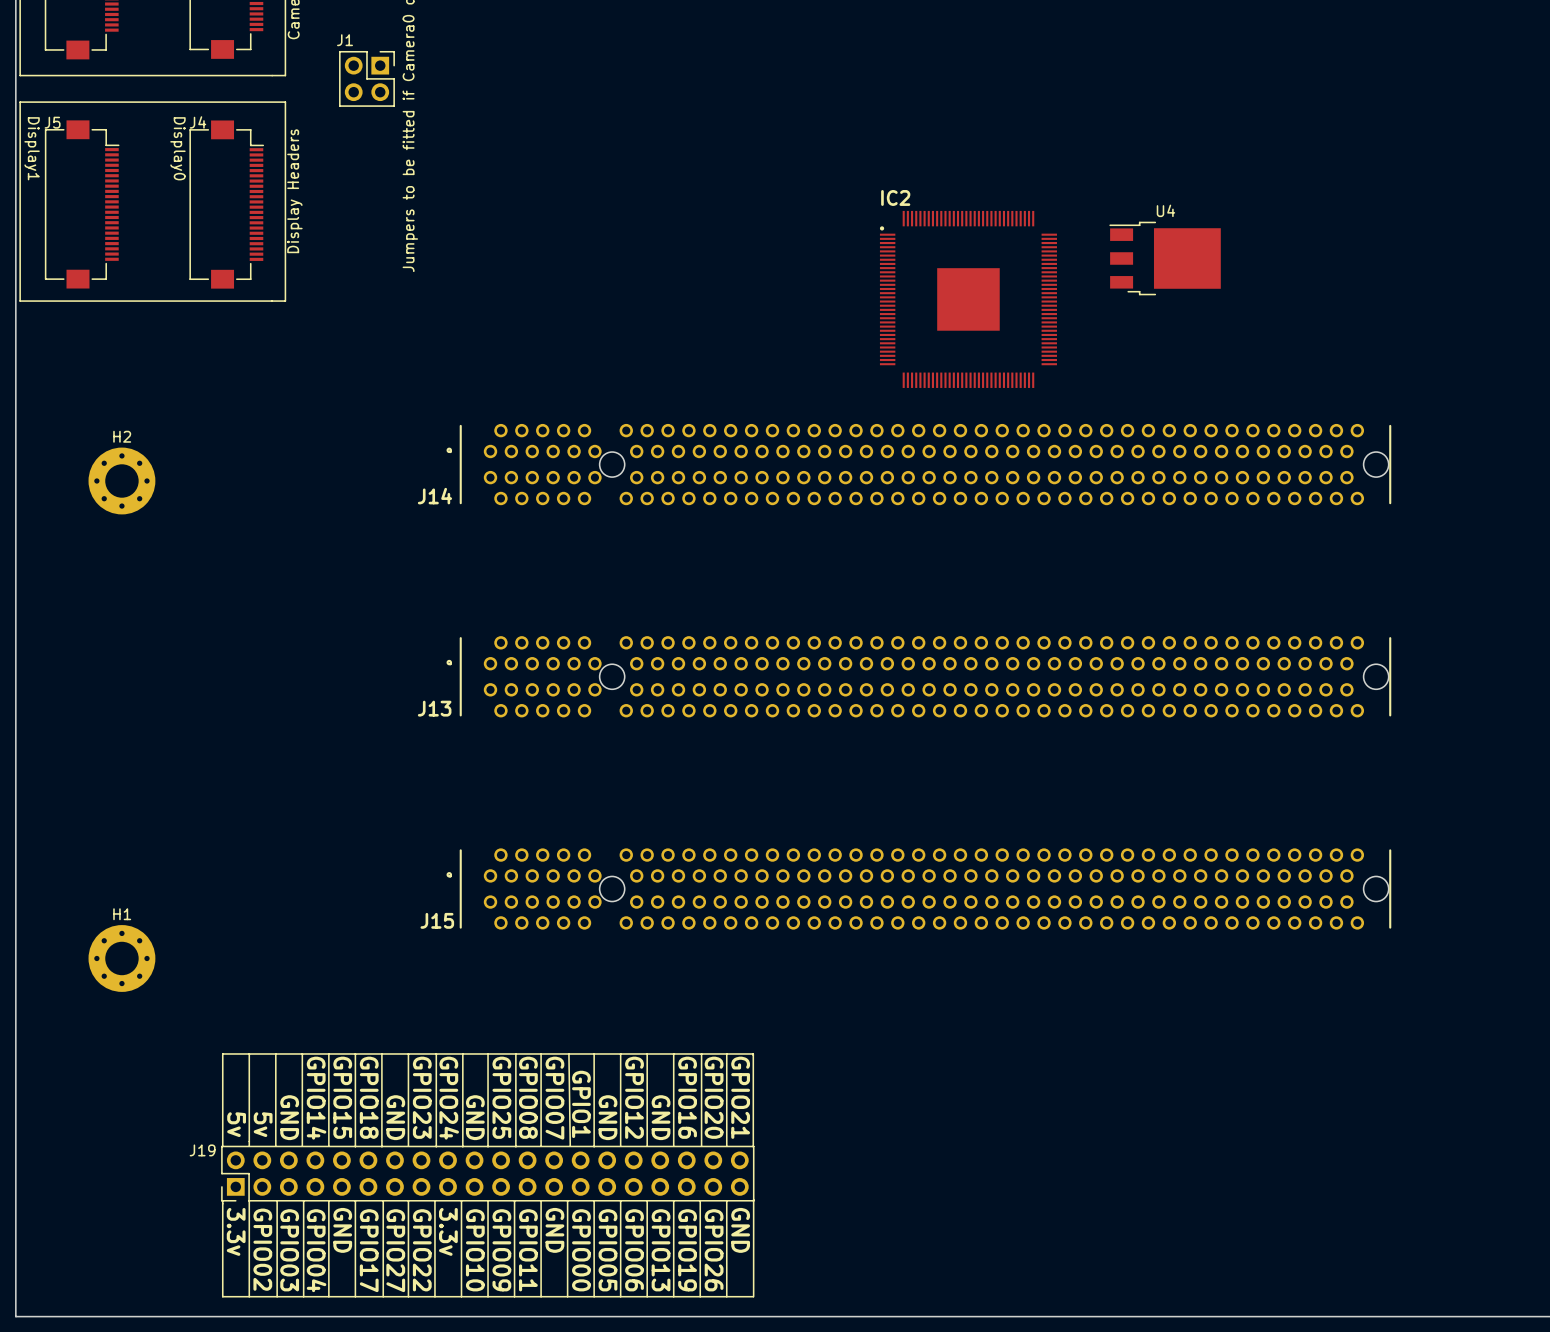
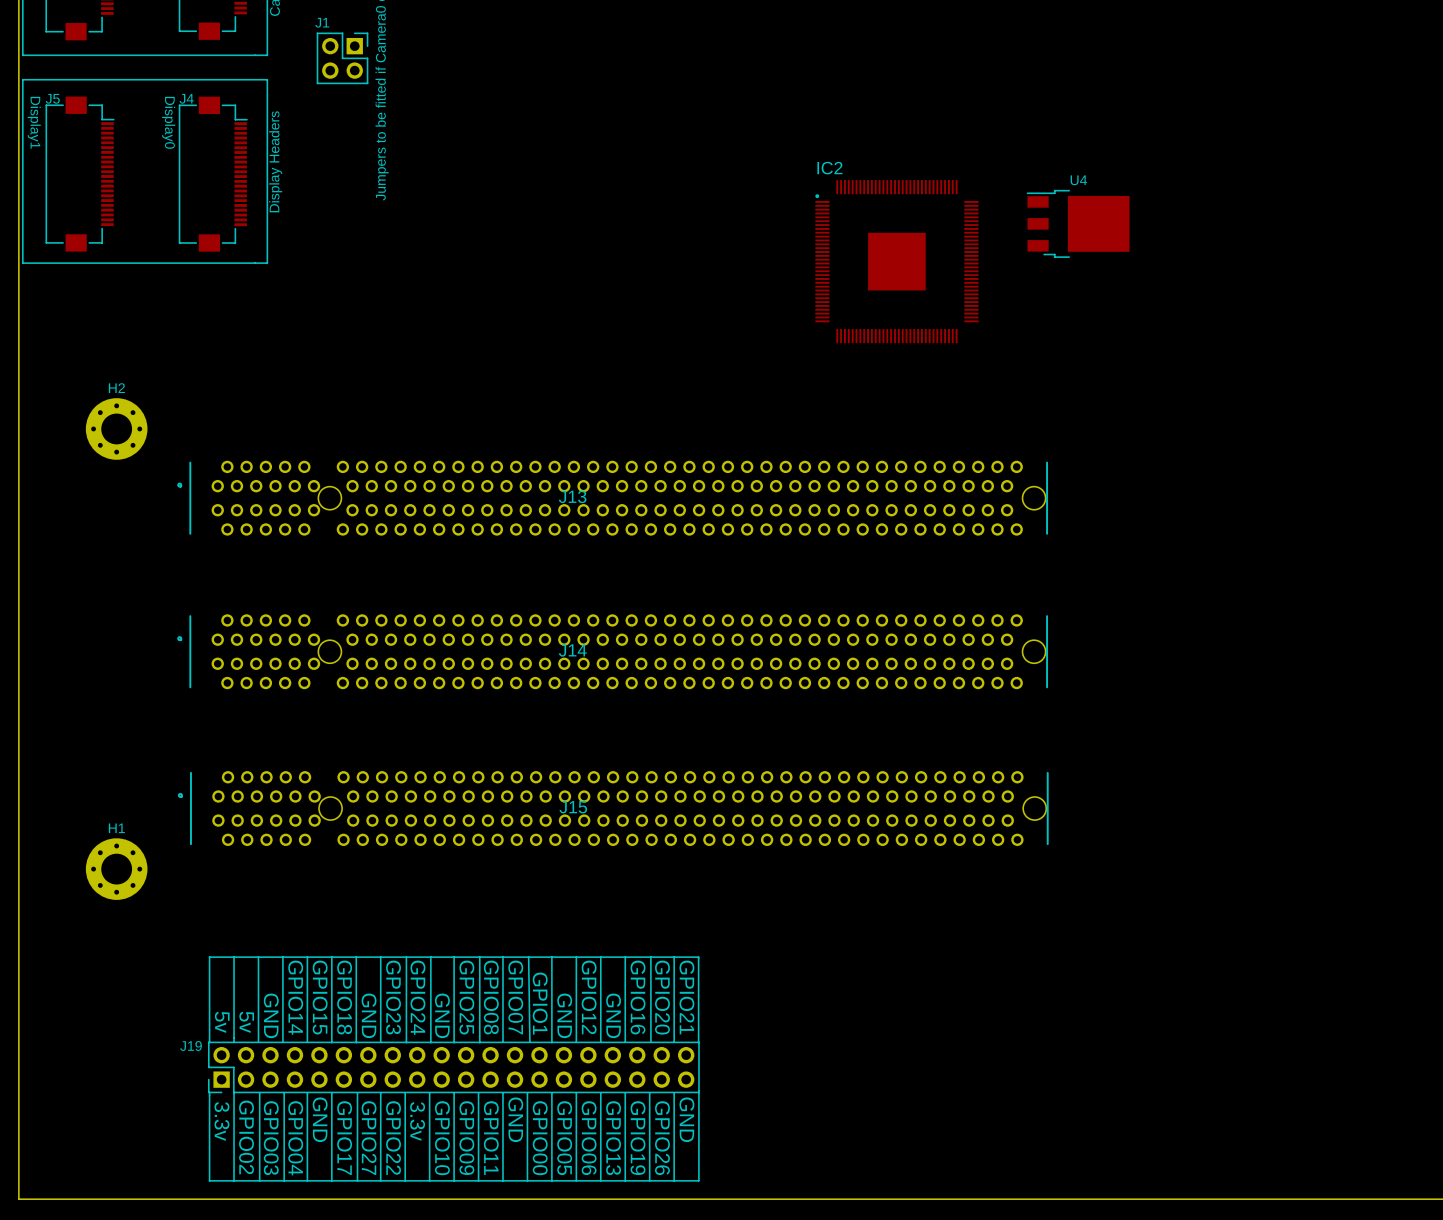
J14 position: (918, 464) -> (612, 651)
J14 name position: J14 (434, 496) -> J14 (572, 650)
J13 position: (918, 676) -> (612, 498)
J13 name position: J13 (434, 708) -> J13 (572, 496)
J15 position: (918, 888) -> (613, 808)
J15 name position: J15 (437, 920) -> J15 (573, 807)

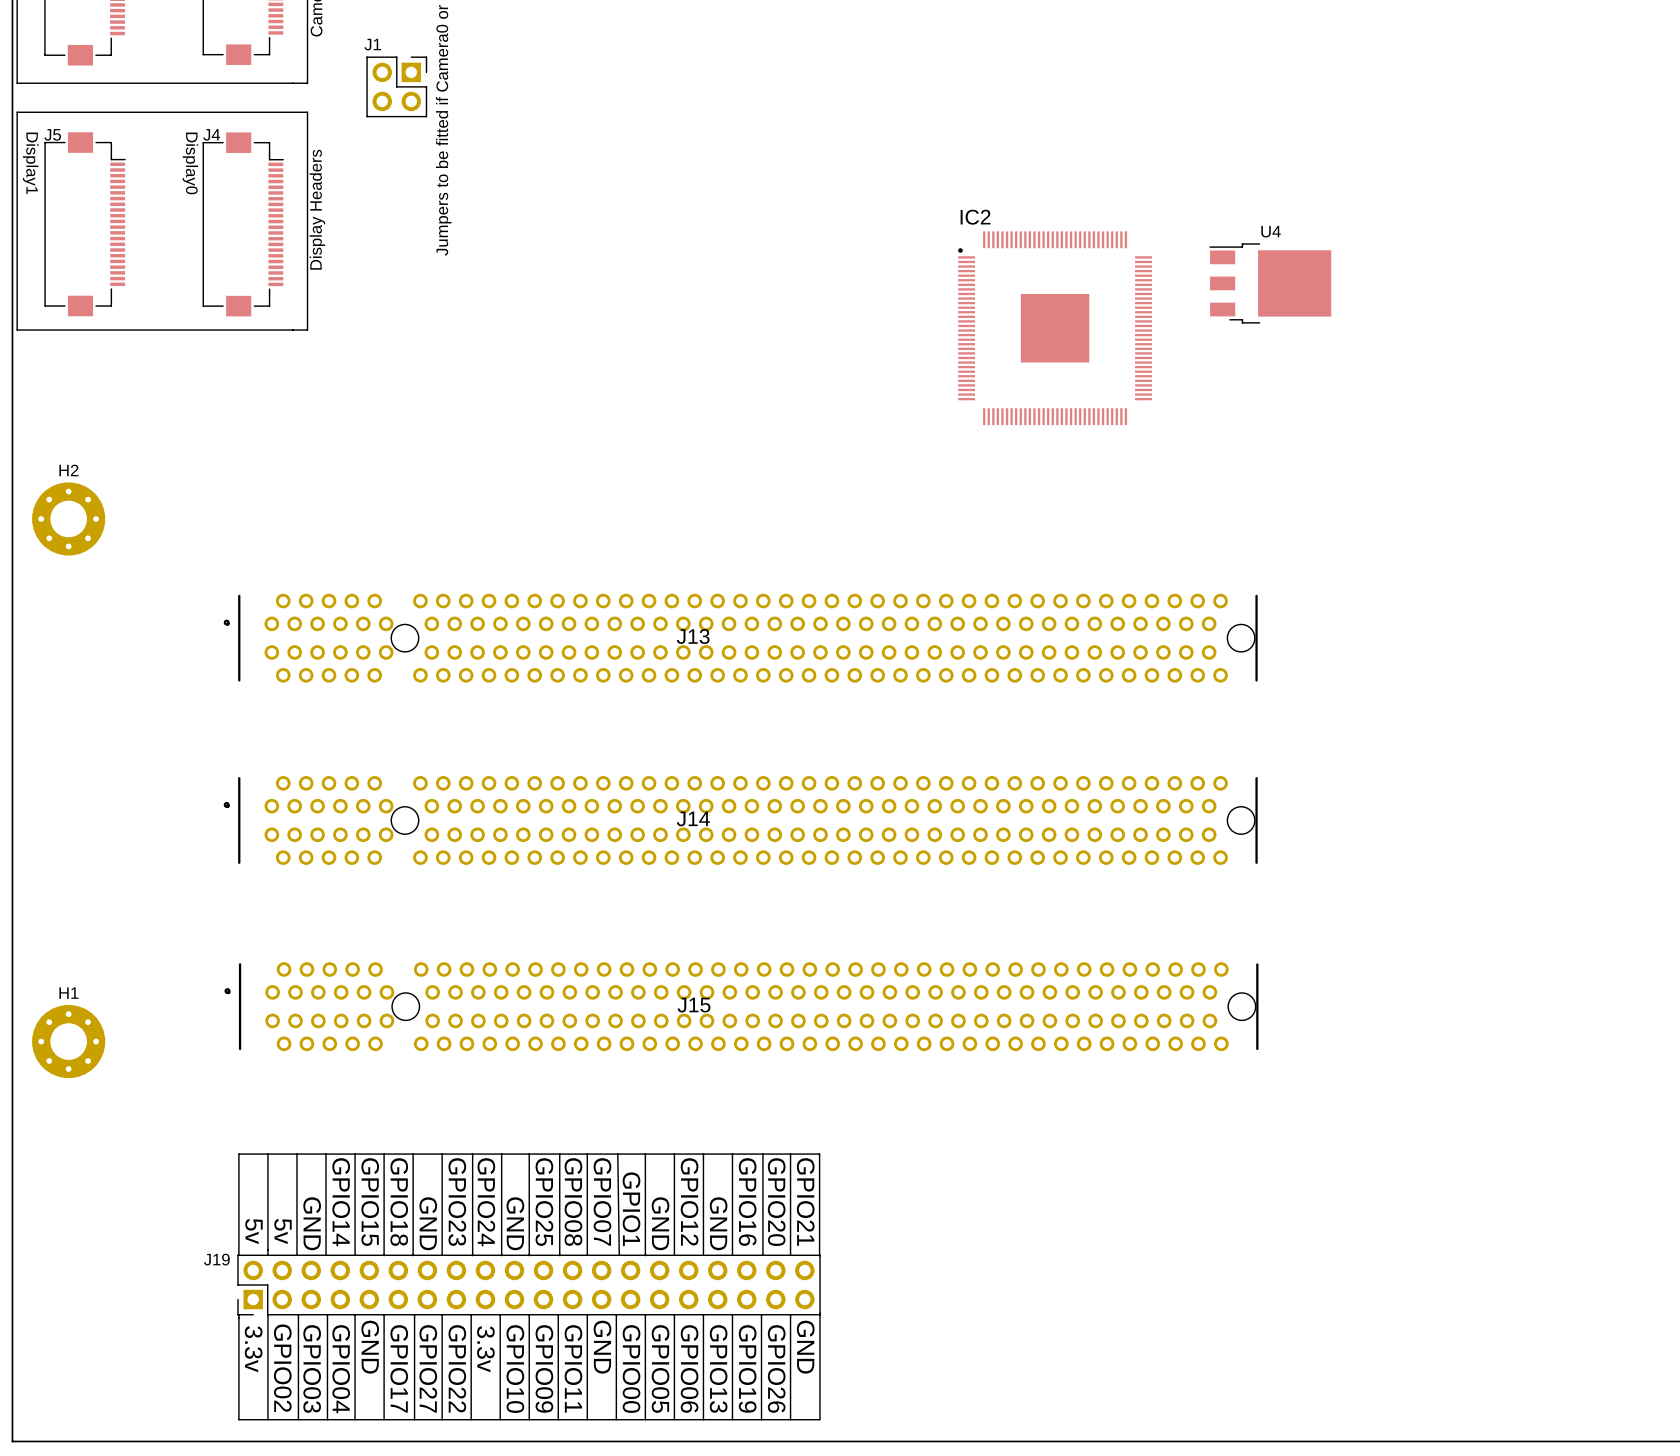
H2 position: (116, 428) -> (68, 518)
J13 position: (612, 498) -> (740, 638)
J14 position: (612, 651) -> (740, 820)
J15 position: (613, 808) -> (741, 1006)
H1 position: (116, 869) -> (68, 1041)

